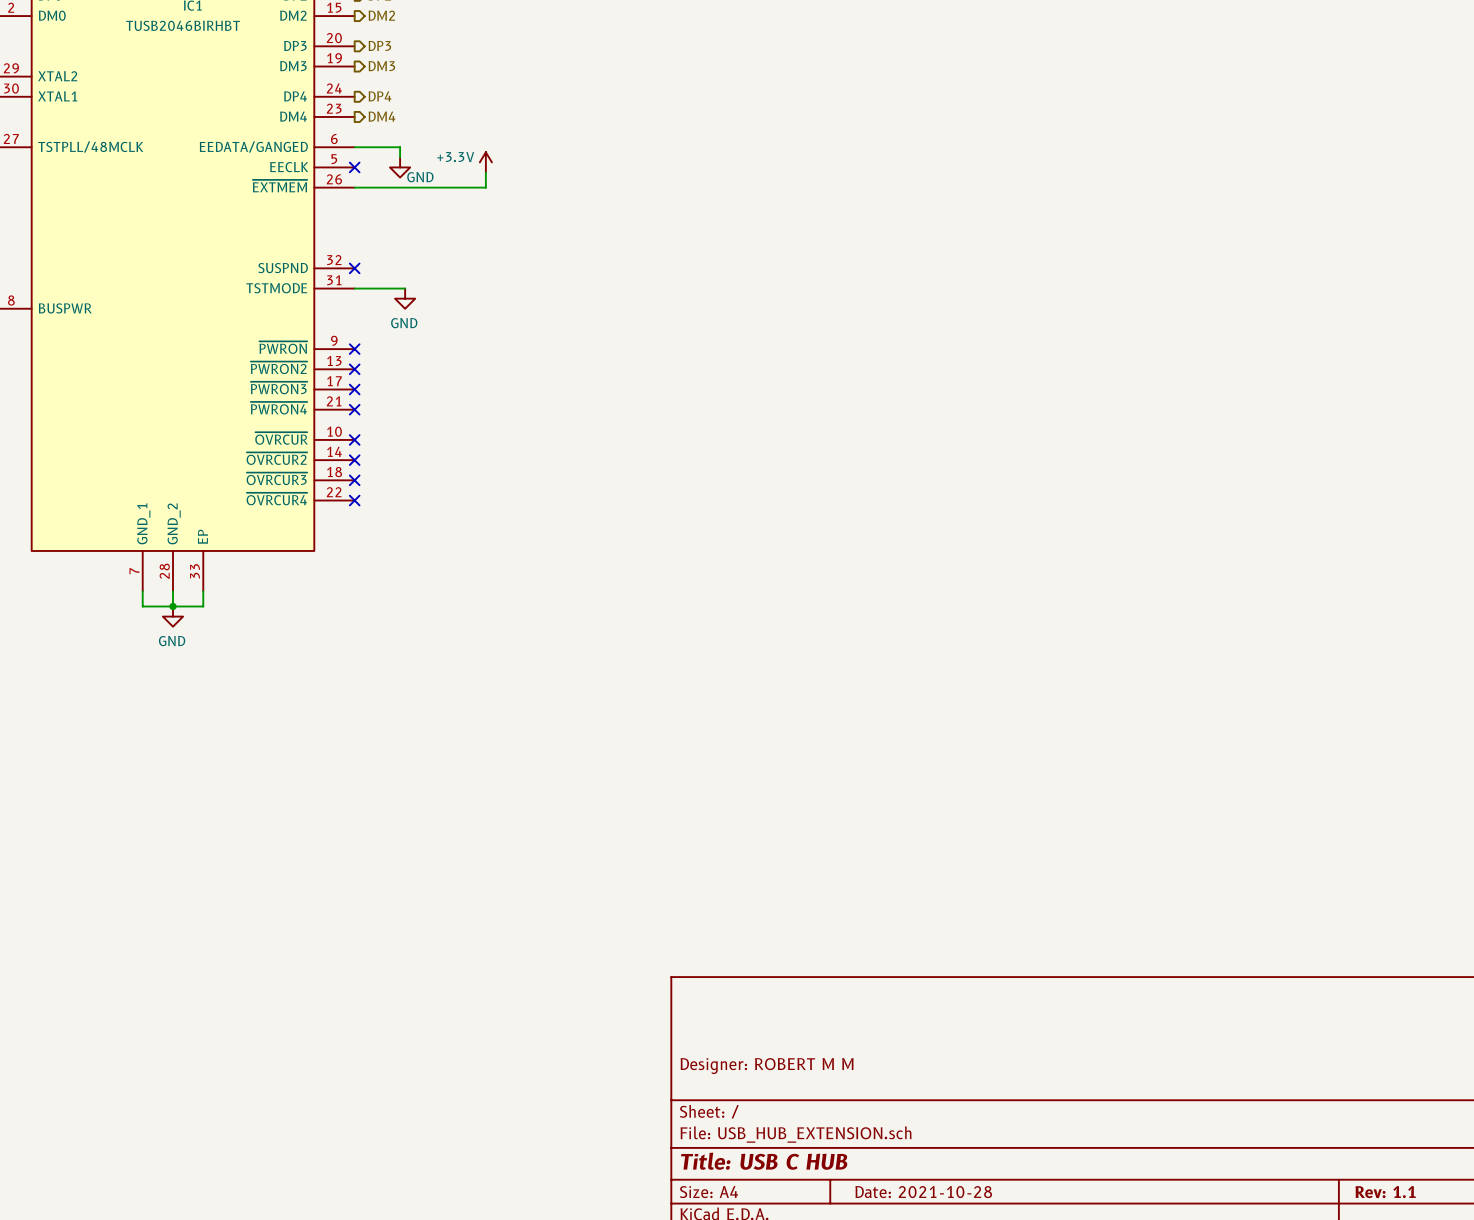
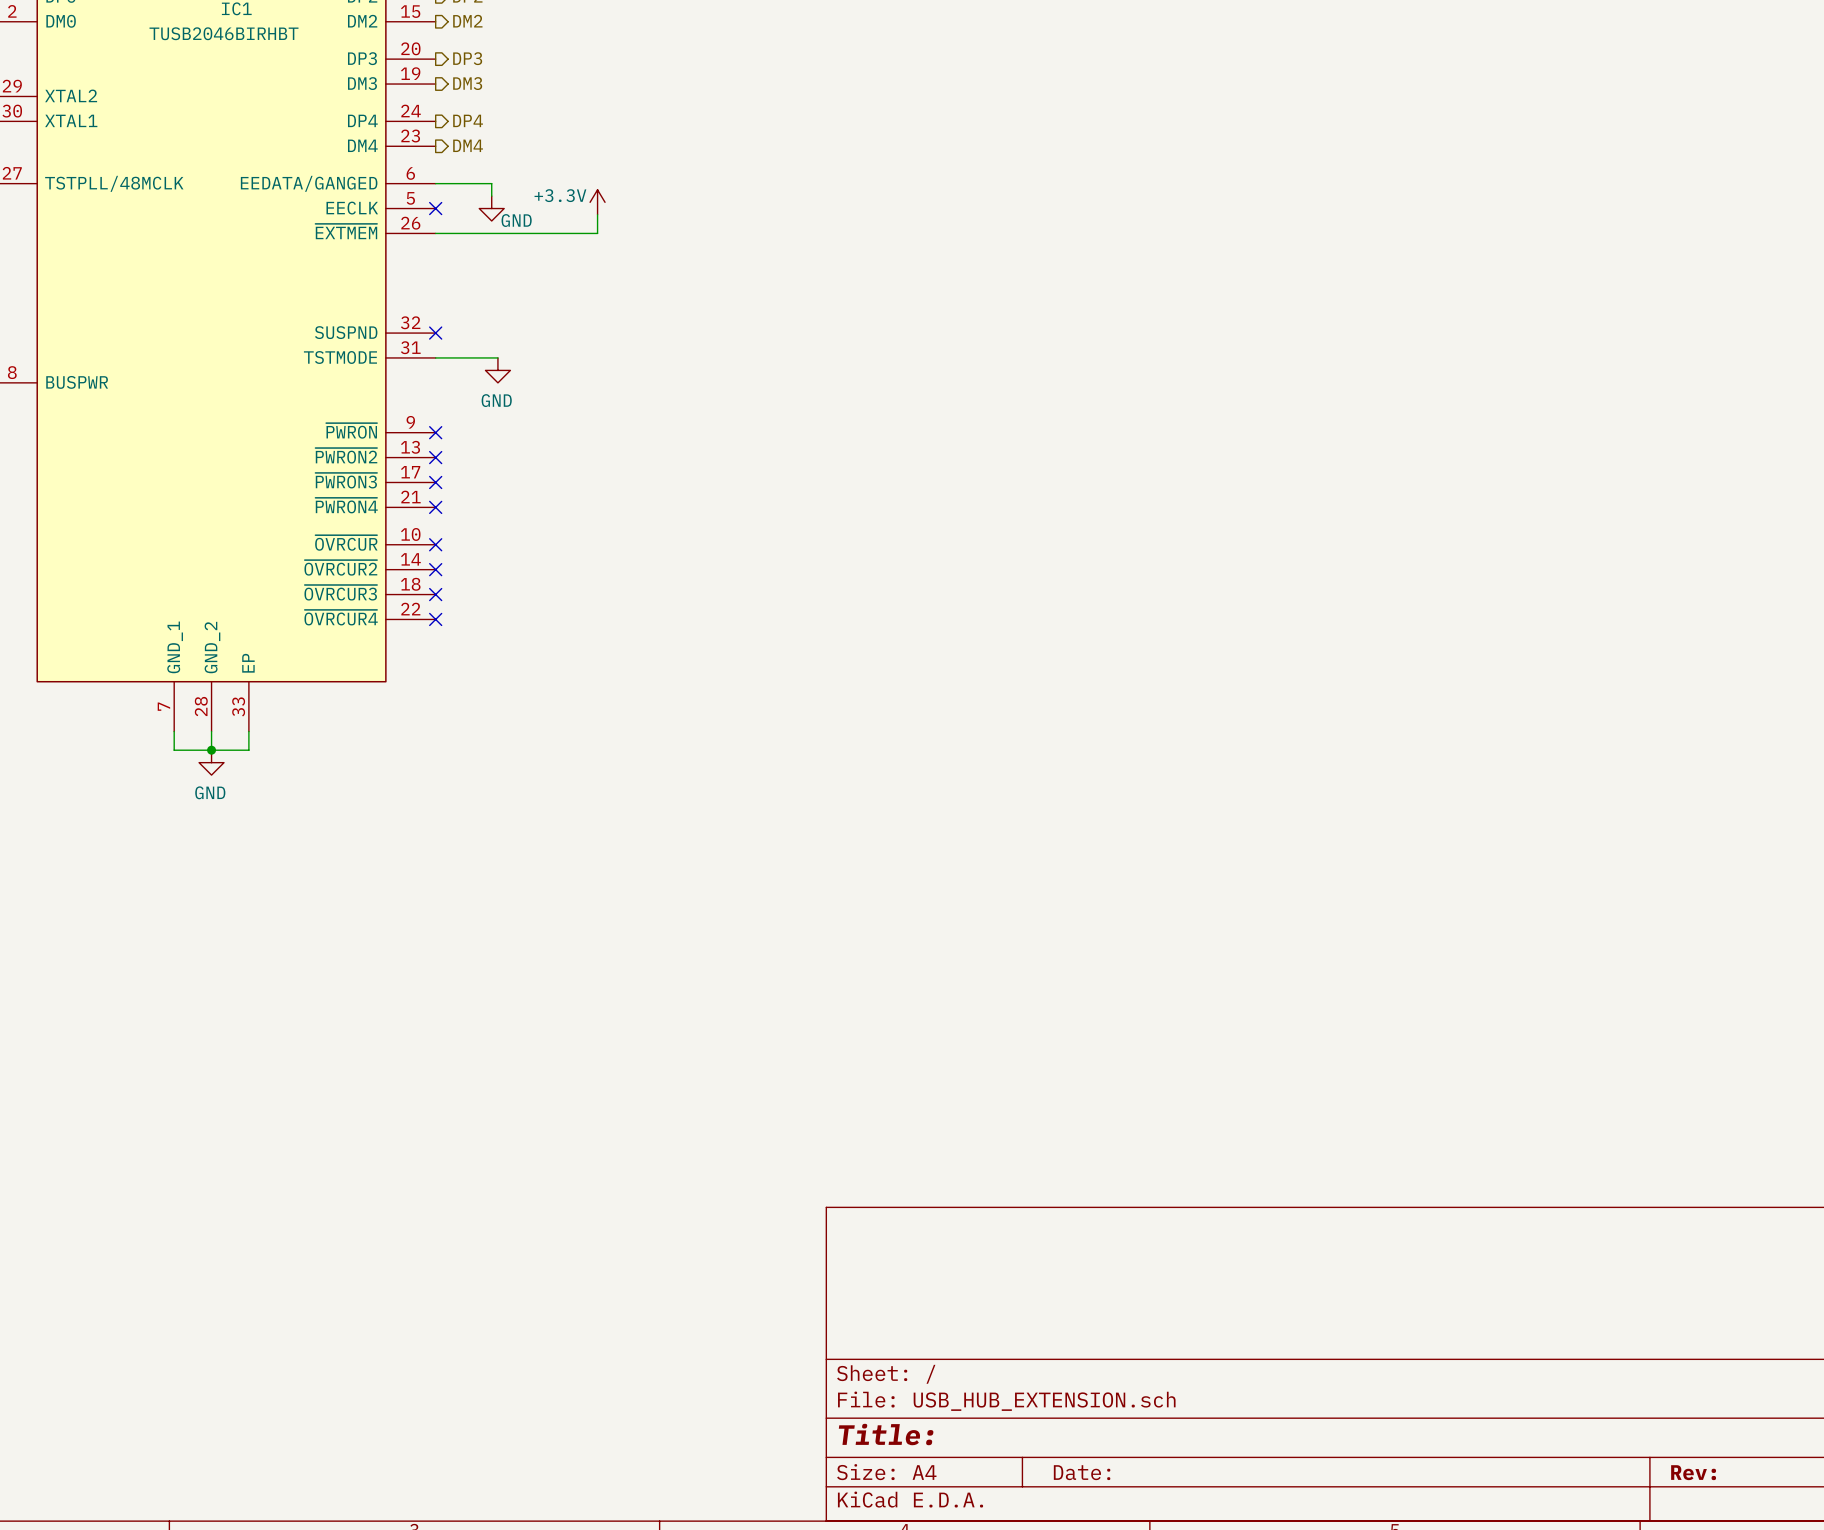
title block: Designer: ROBERT M M (767, 1066) -> none
title block: Title: USB C HUB (764, 1161) -> Title: (886, 1434)
title block: Date: 2021-10-28 (923, 1192) -> Date: (1082, 1472)
title block: Rev: 1.1 (1385, 1192) -> Rev: (1693, 1472)

